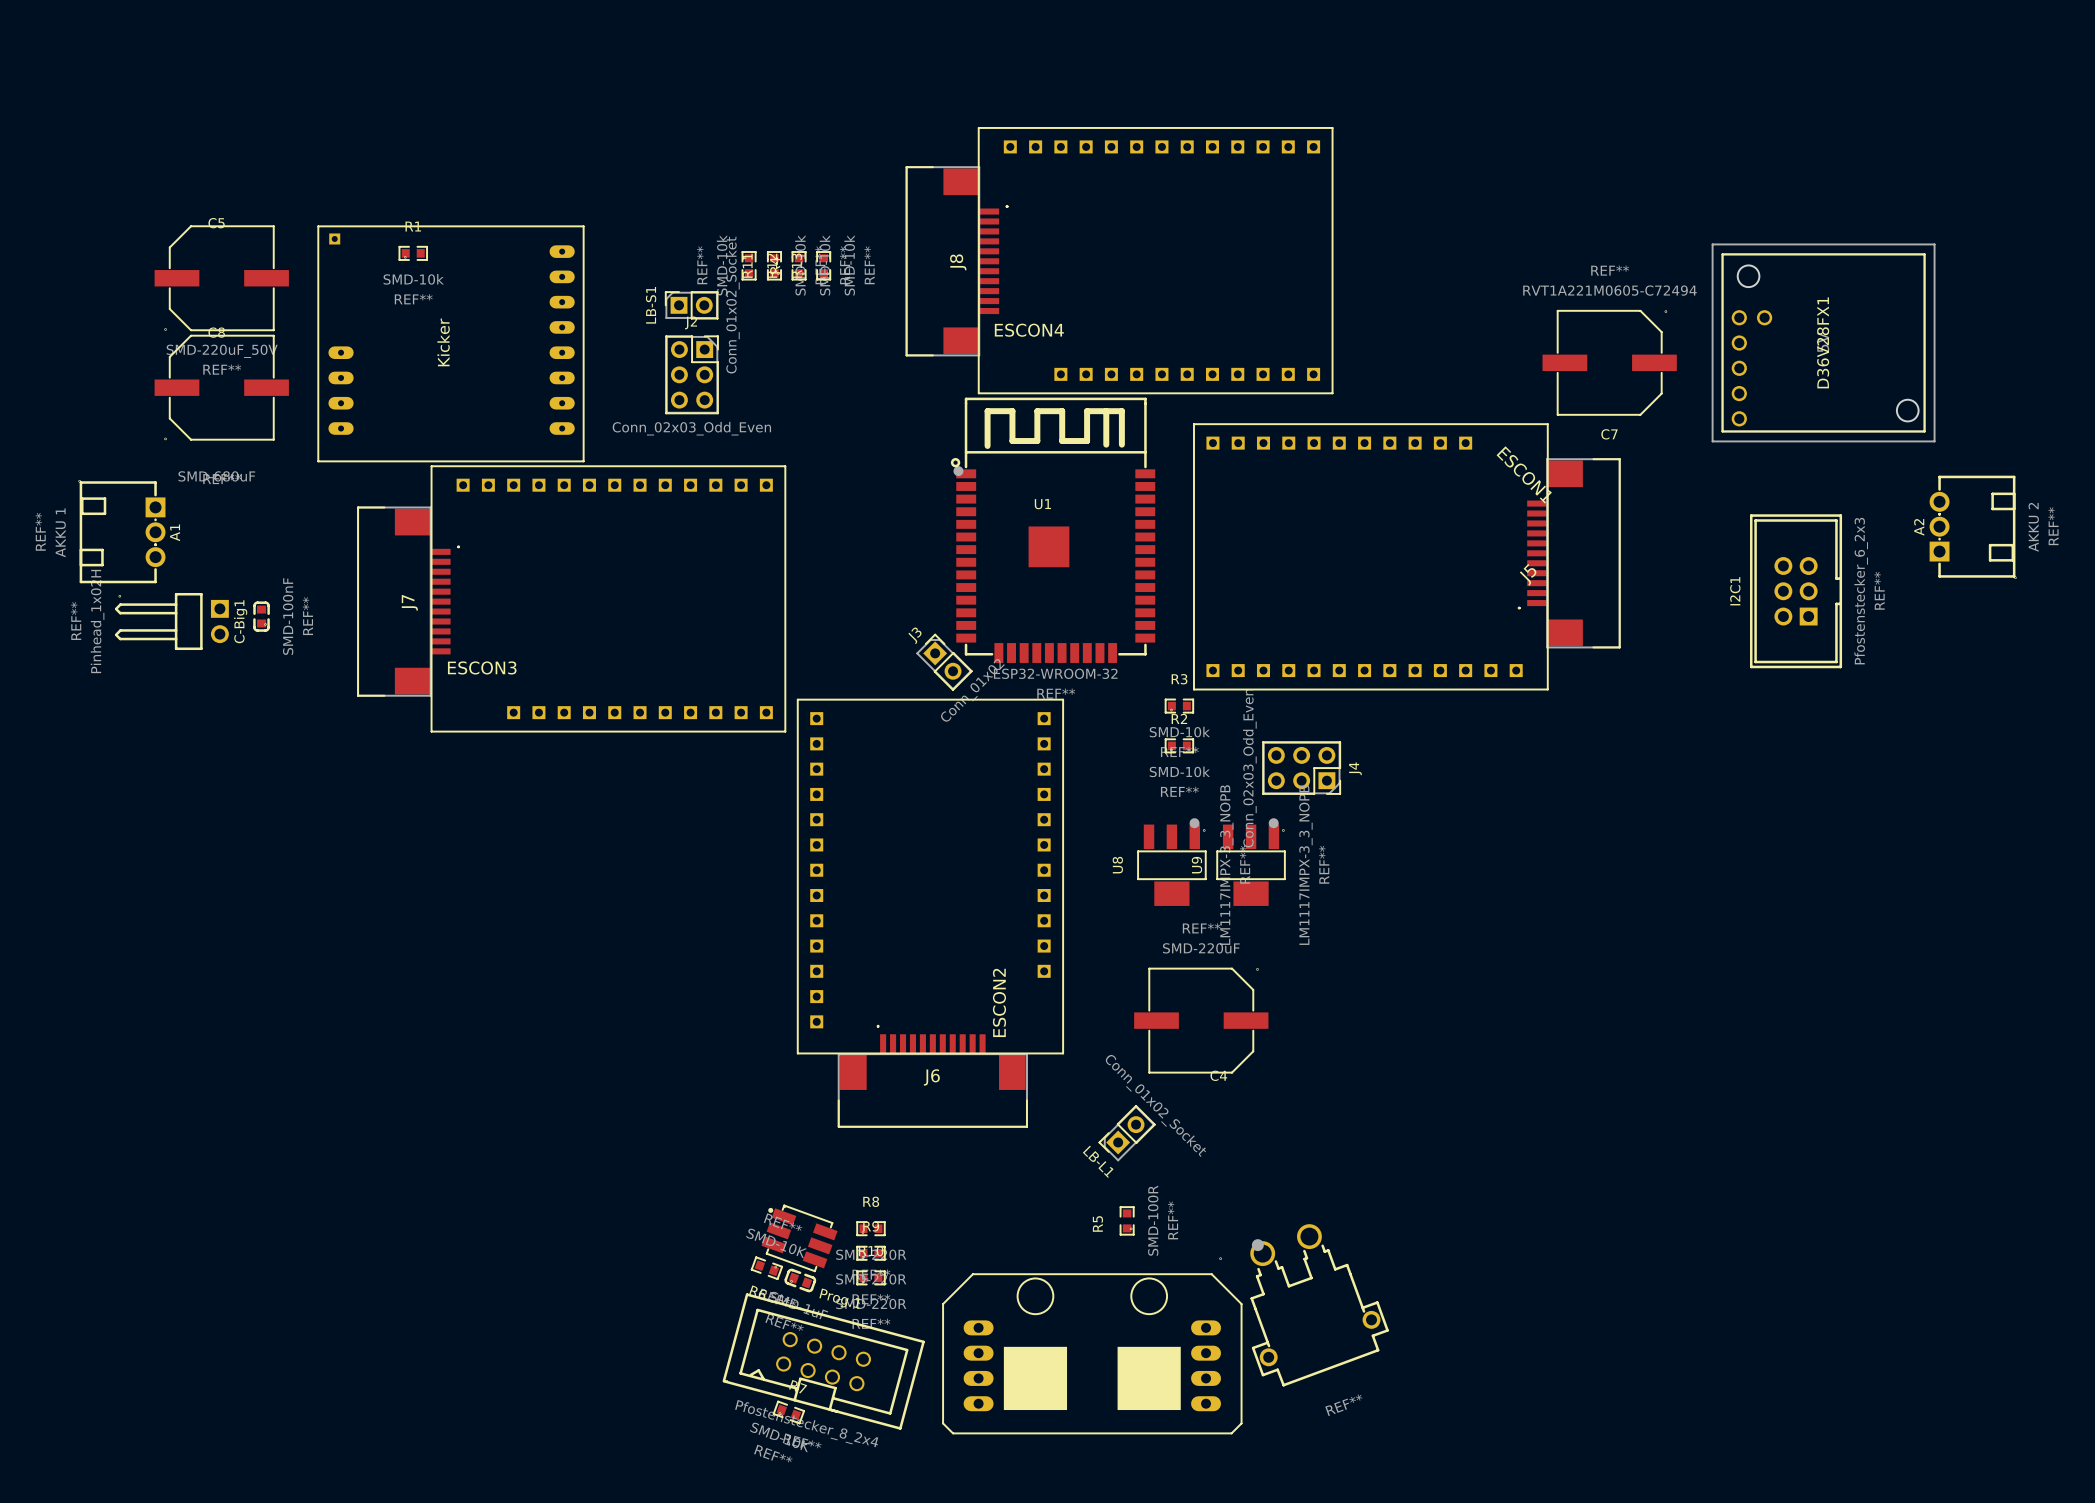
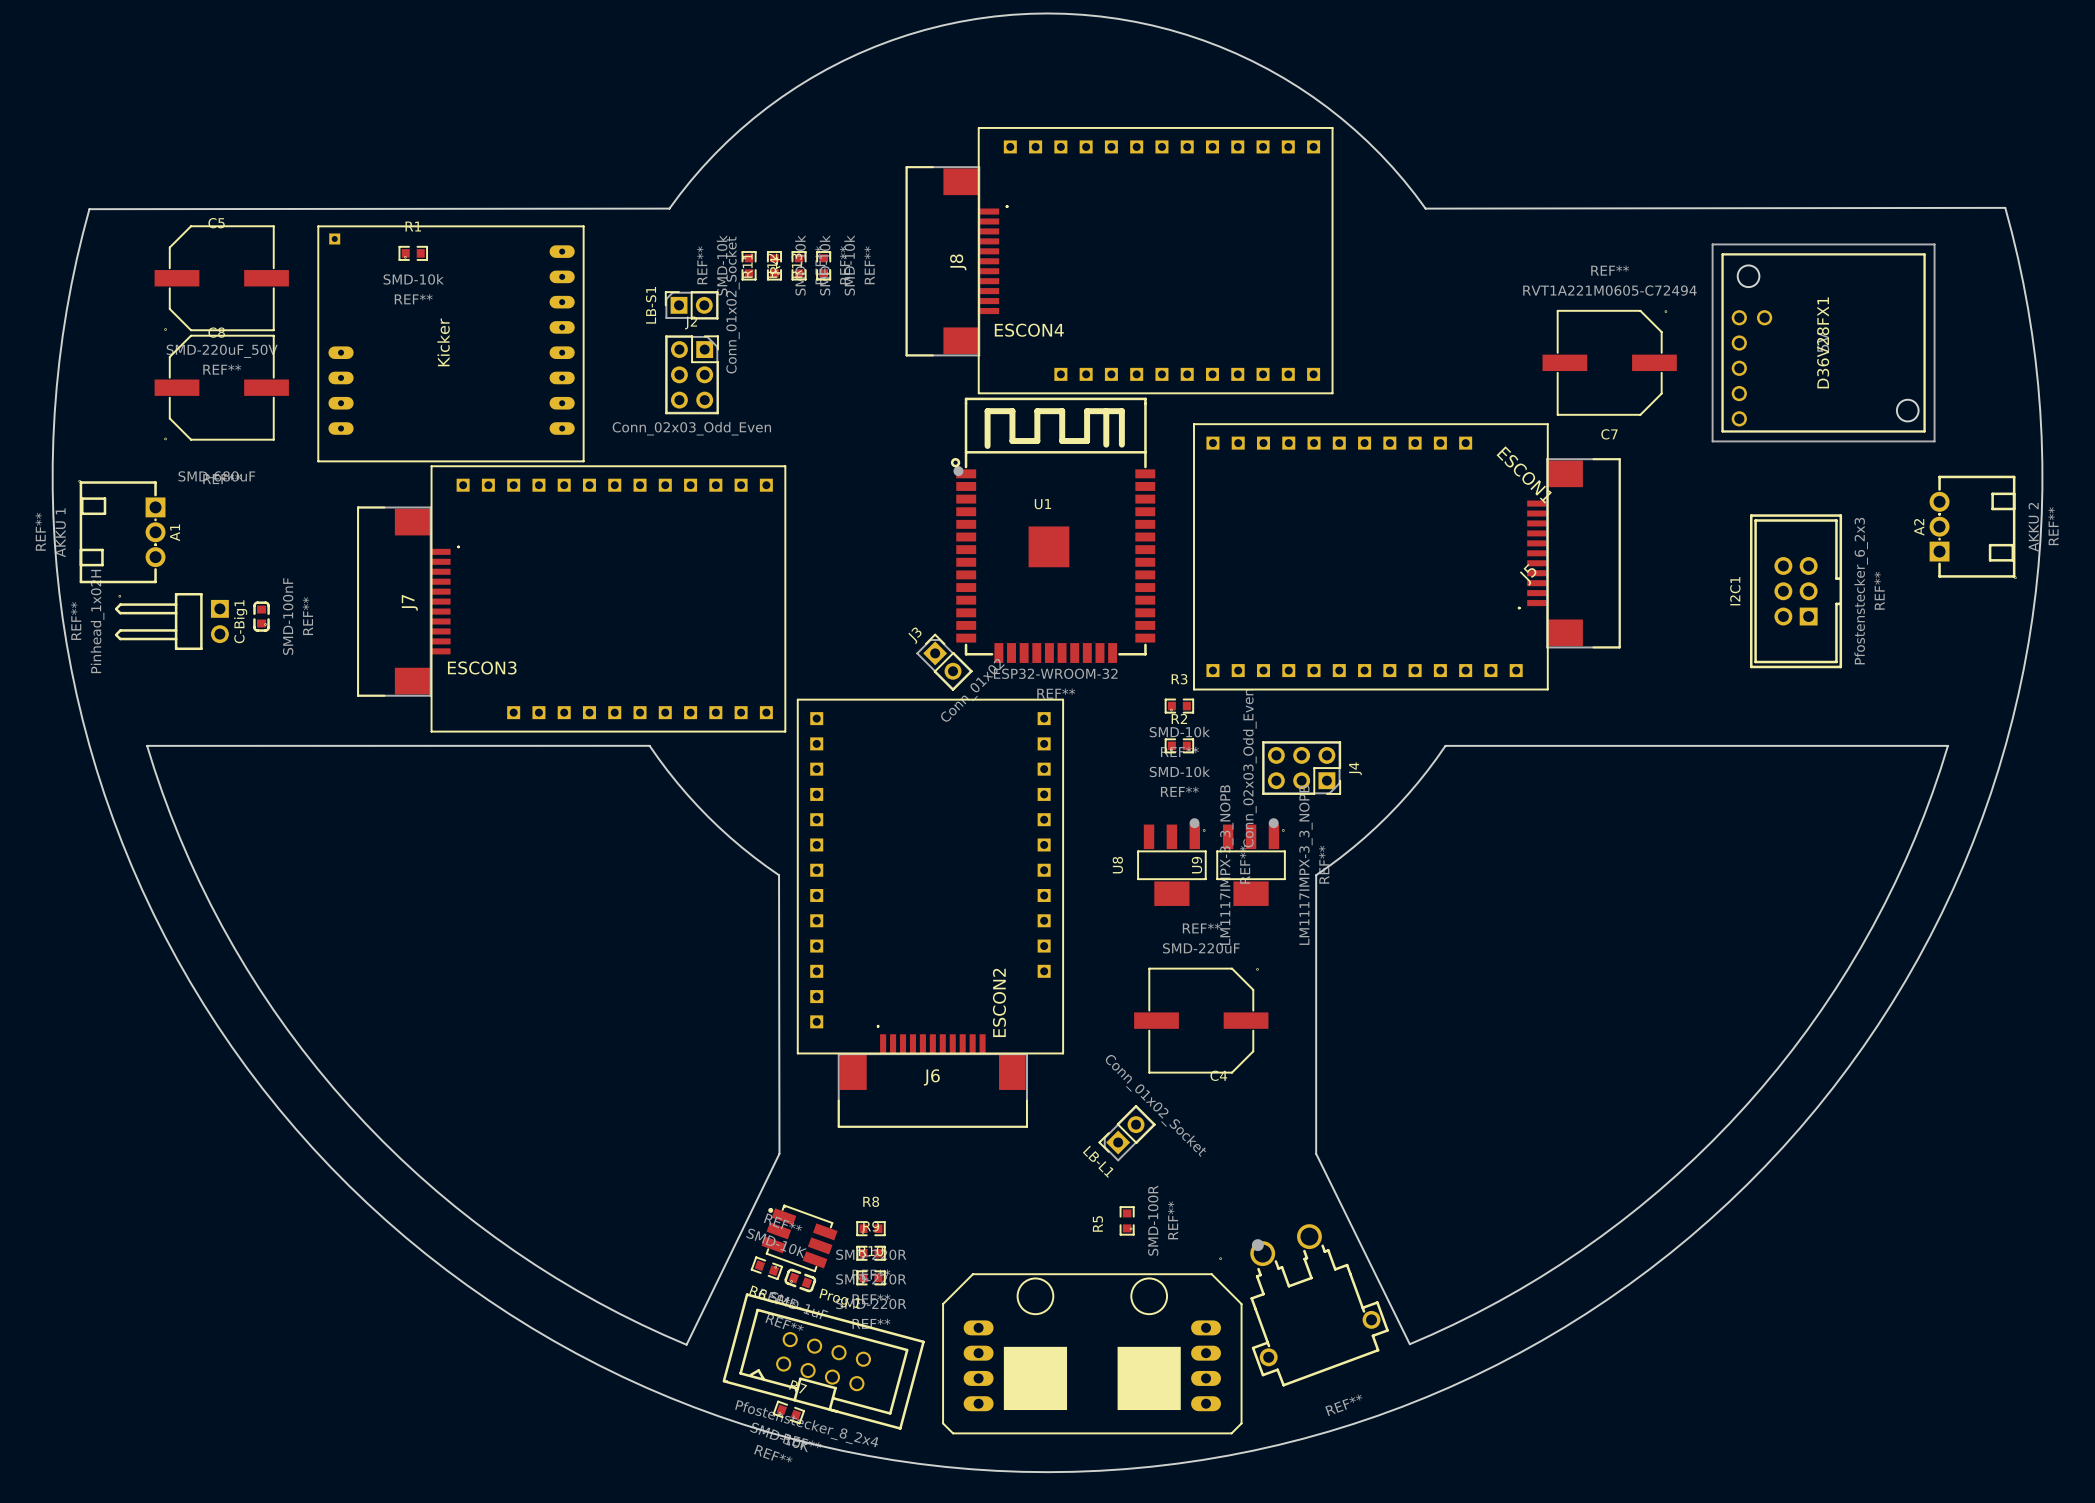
board edge: none -> (2005, 207) (1425, 208) (1392, 167) (1354, 129) (1298, 87) (1252, 61) (1203, 40) (1152, 25) (1100, 16) (1047, 13) (994, 16) (925, 29) (874, 46) (826, 69) (781, 97) (740, 129) (702, 167) (669, 208) (89, 209) (71, 284) (59, 361) (54, 412) (52, 490) (56, 567) (62, 618) (76, 695) (89, 745) (122, 843) (165, 937) (217, 1026) (262, 1089) (330, 1167) (406, 1237) (467, 1285) (554, 1341) (622, 1377) (718, 1416) (817, 1445) (919, 1463) (1022, 1471) (1125, 1469) (1202, 1460) (1303, 1438) (1402, 1406) (1496, 1365) (1586, 1313) (1649, 1269) (1728, 1202) (1783, 1147) (1848, 1067) (1905, 981) (1953, 889) (1990, 793) (2012, 718) (2032, 617) (2041, 514) (2040, 411) (2028, 308) (2018, 257) (2011, 232) (2005, 207)
board edge: none -> (147, 745) (649, 745) (677, 782) (708, 816) (742, 847) (779, 875) (779, 1153) (686, 1344) (598, 1302) (514, 1251) (455, 1207) (418, 1175) (349, 1106) (287, 1030) (234, 947) (210, 904) (180, 838) (147, 745)
board edge: none -> (1445, 745) (1947, 745) (1924, 815) (1905, 860) (1860, 947) (1807, 1029) (1746, 1105) (1677, 1174) (1601, 1236) (1560, 1264) (1497, 1301) (1409, 1344) (1316, 1153) (1316, 875) (1353, 847) (1387, 816) (1417, 782) (1445, 745)

